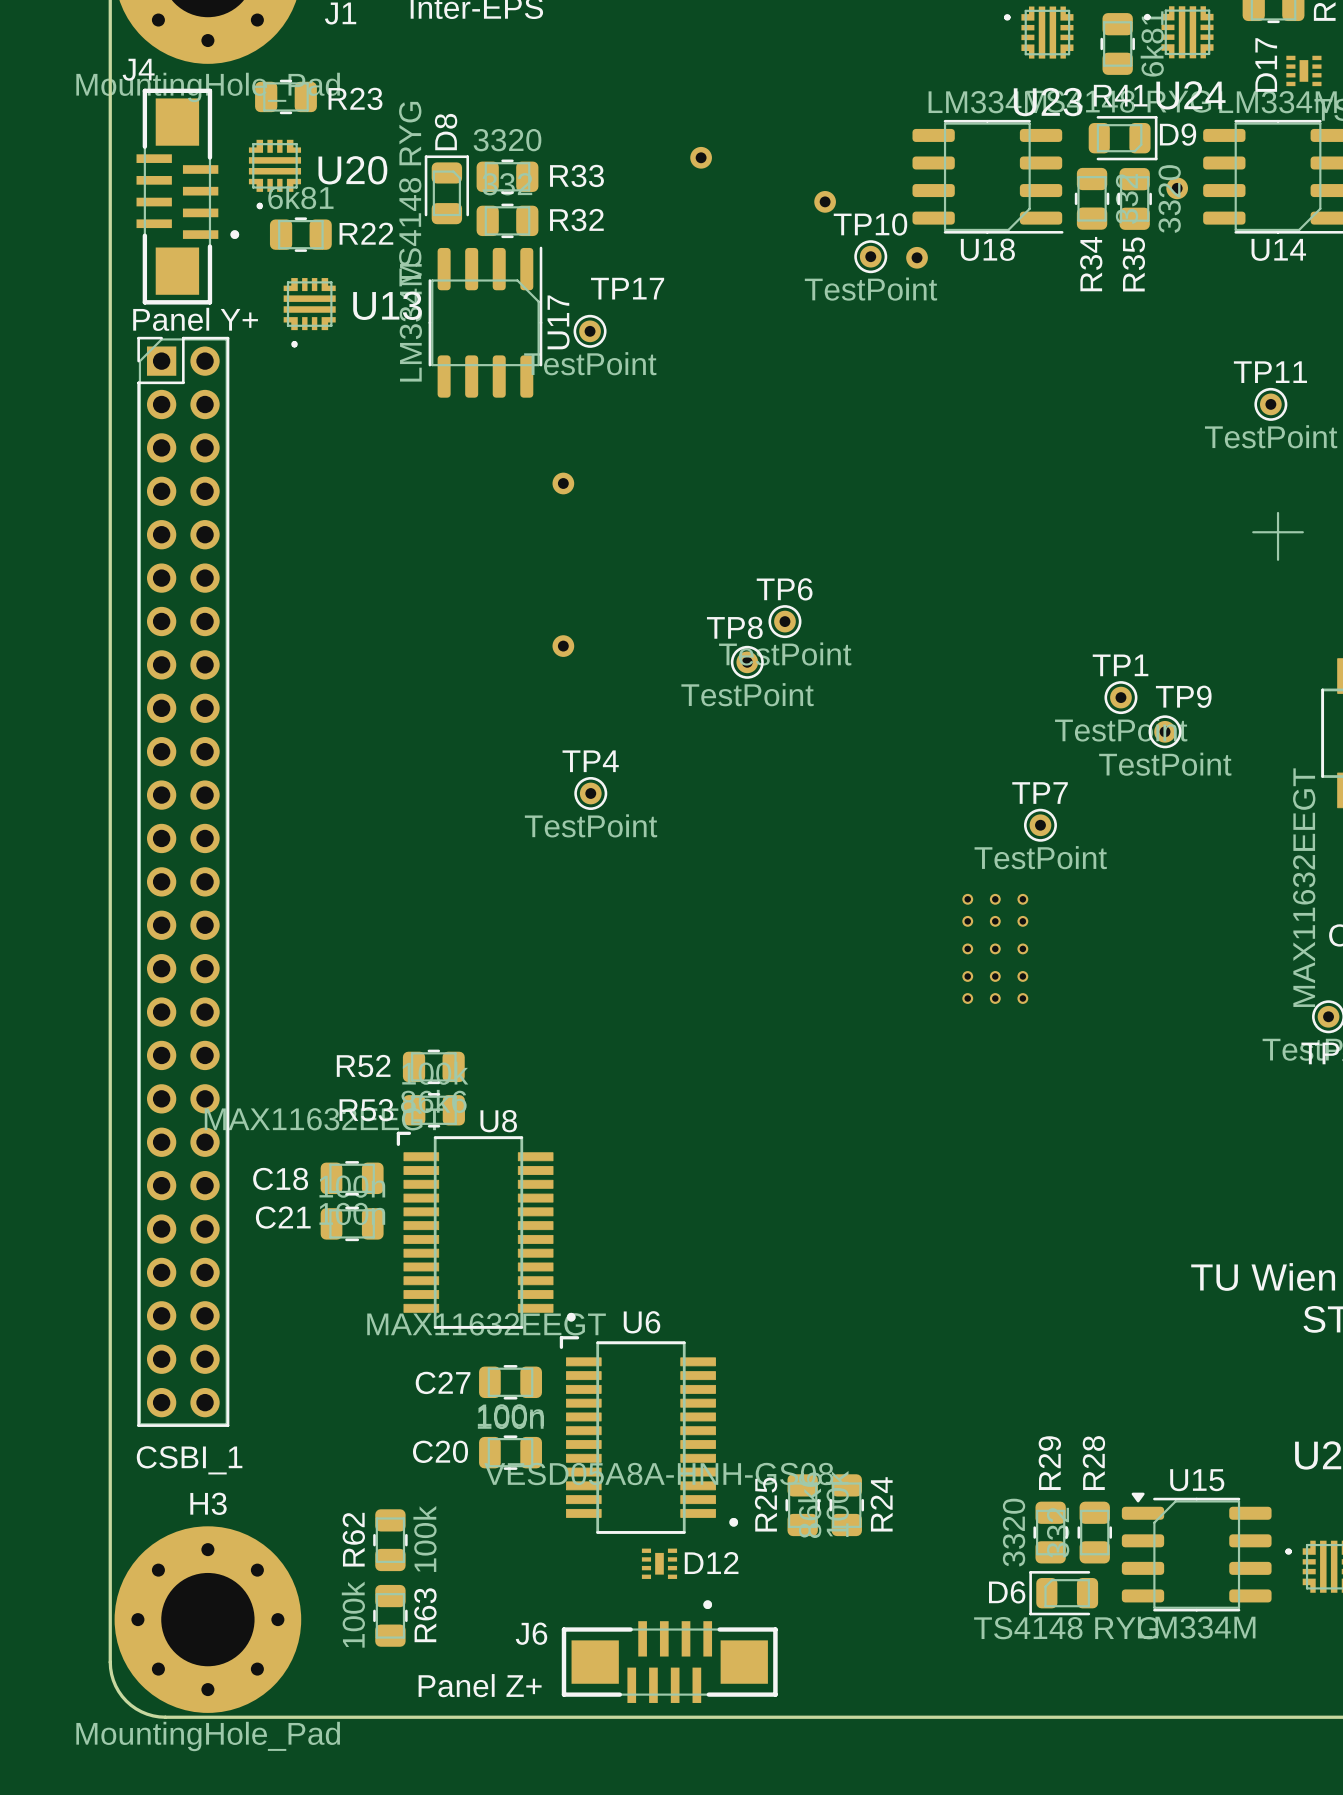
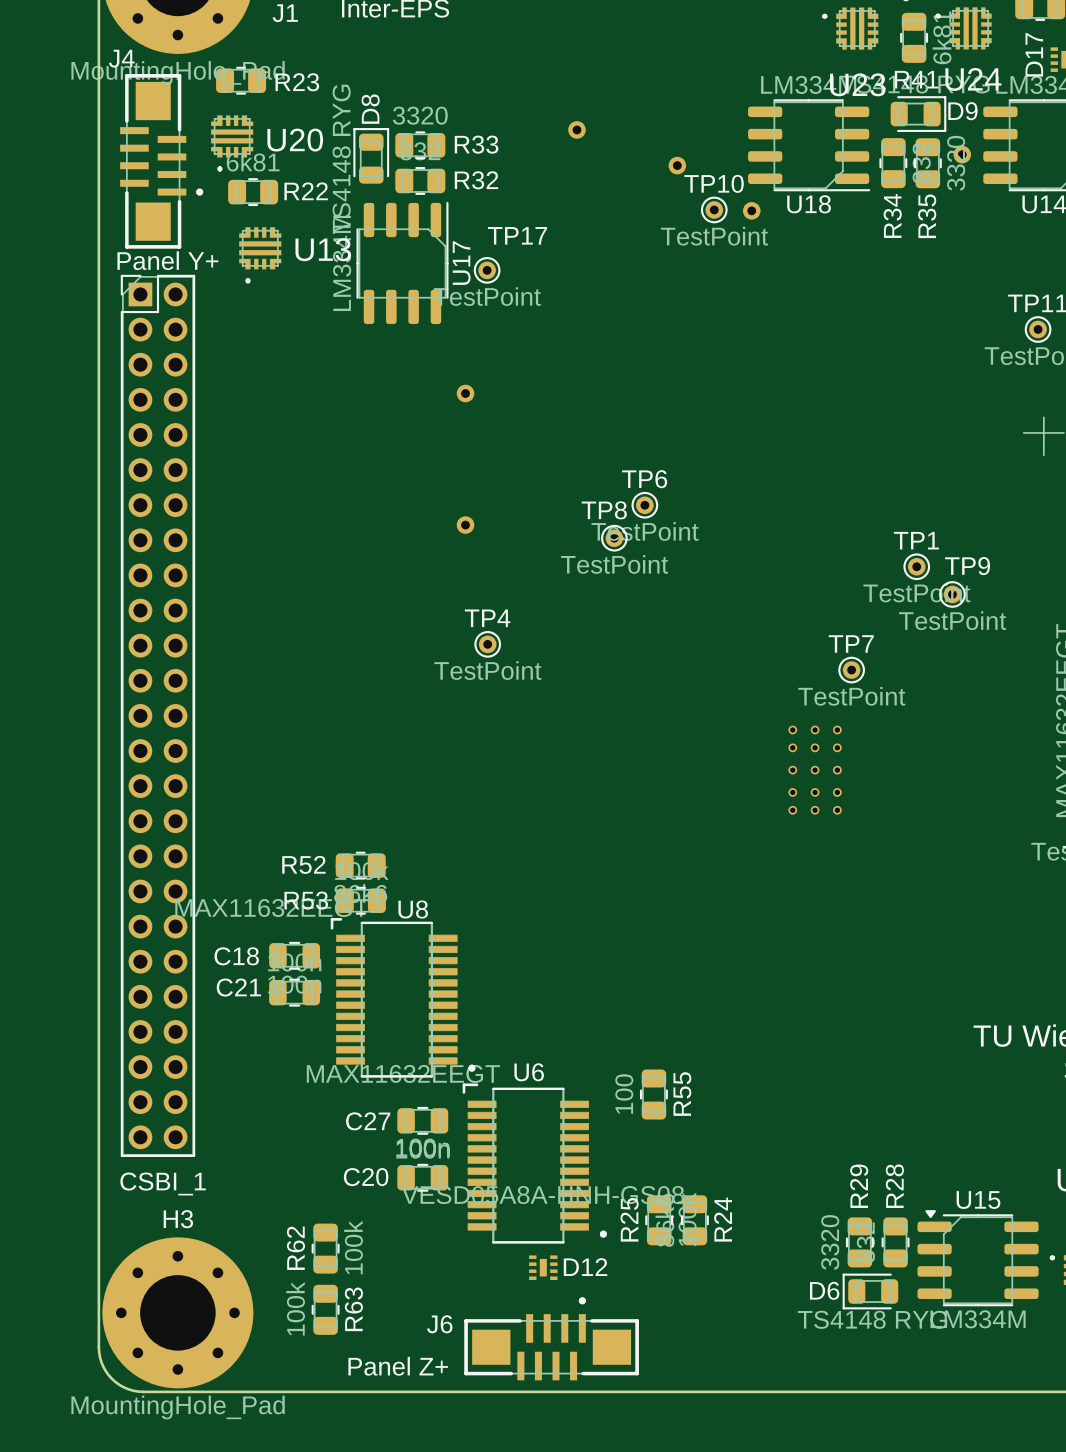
R55: none -> 100 (653, 1094)

